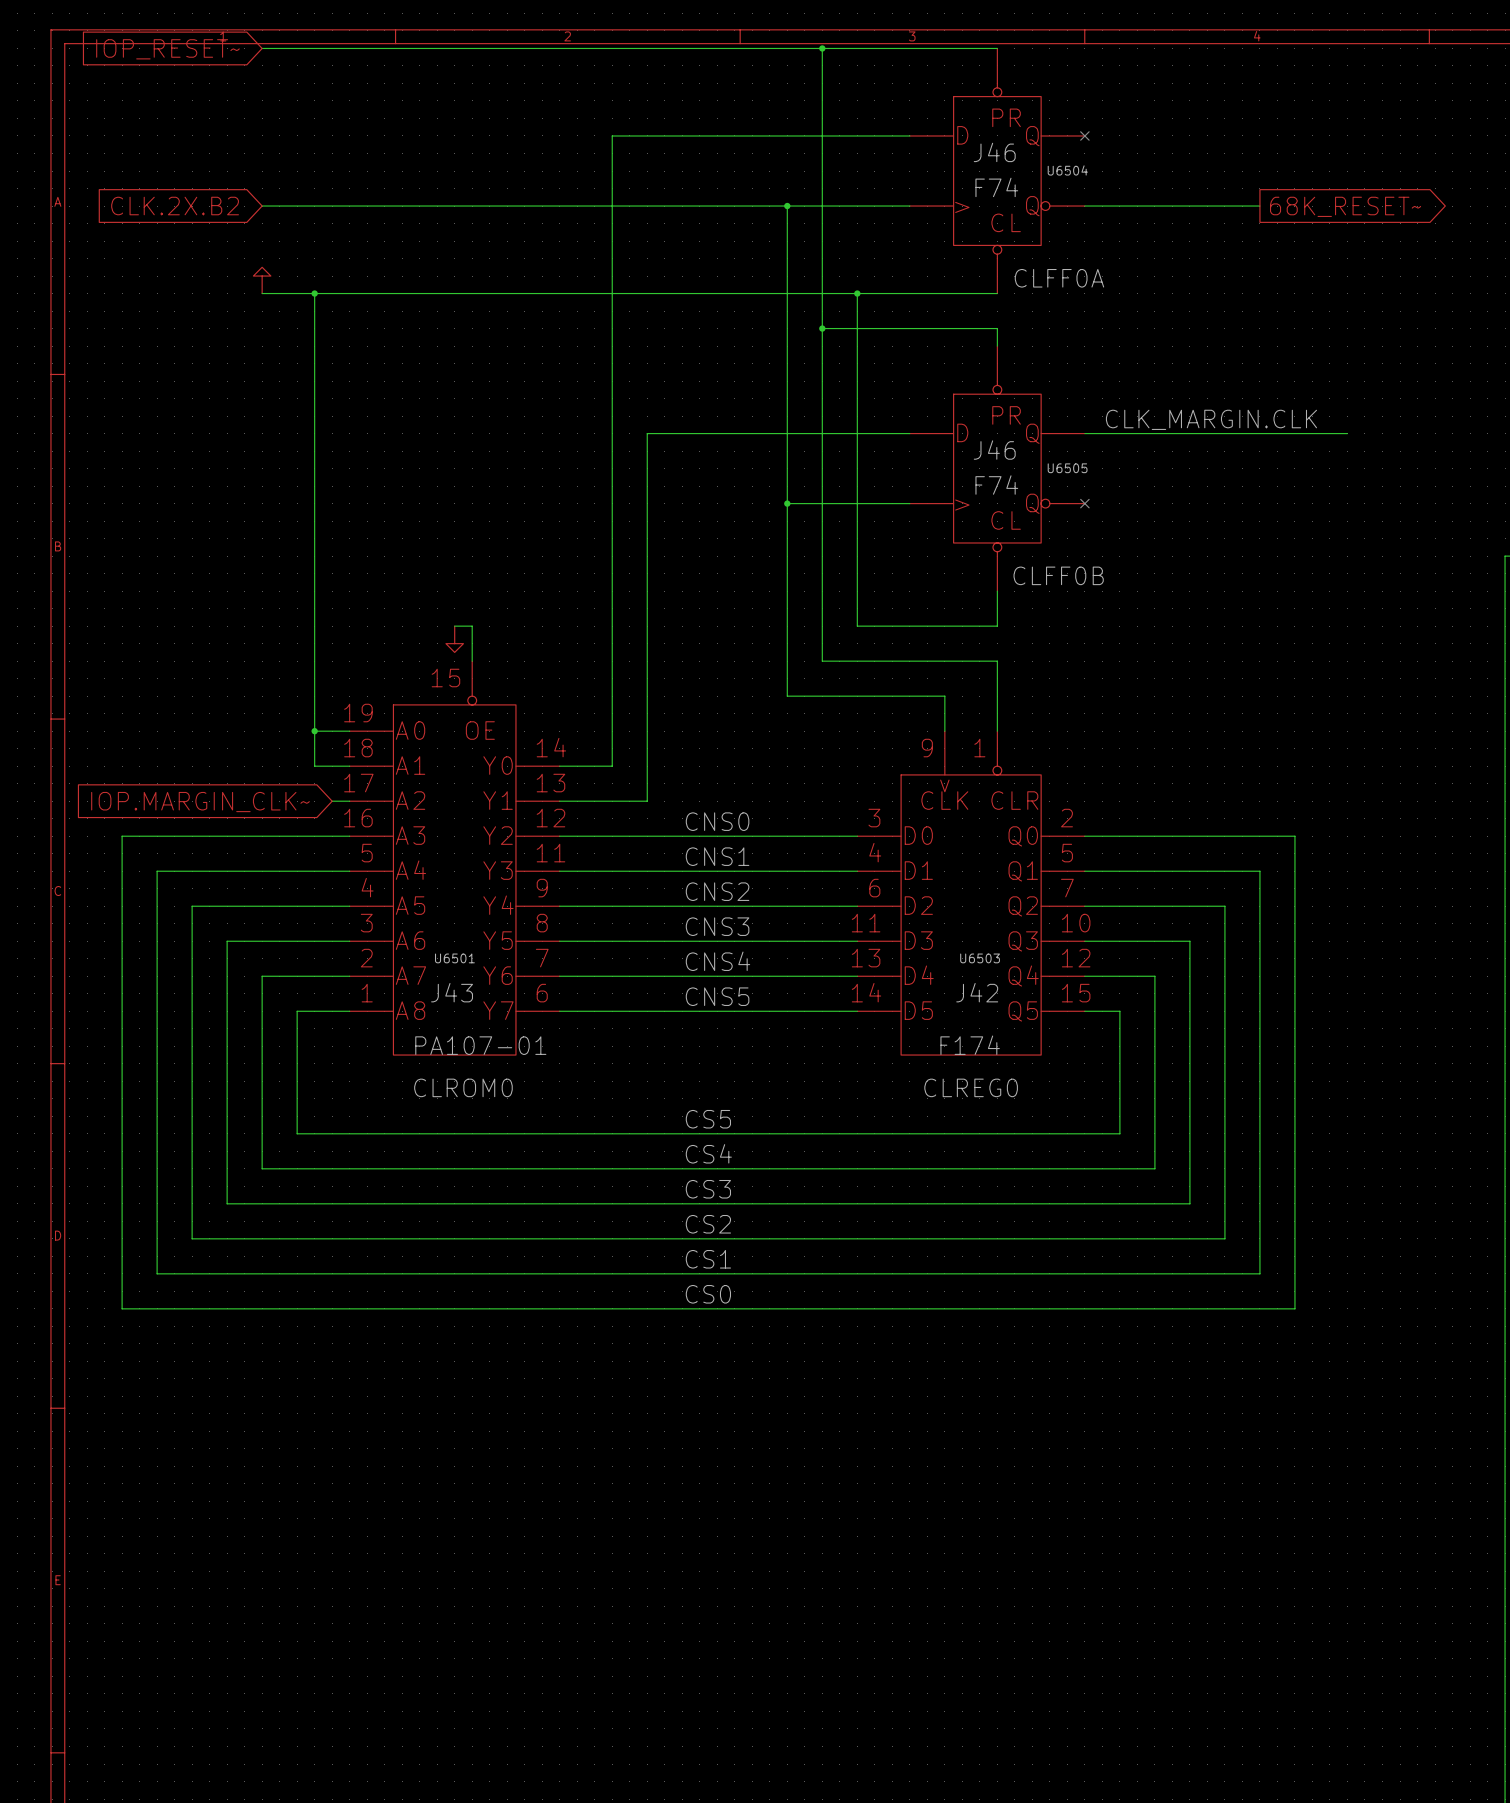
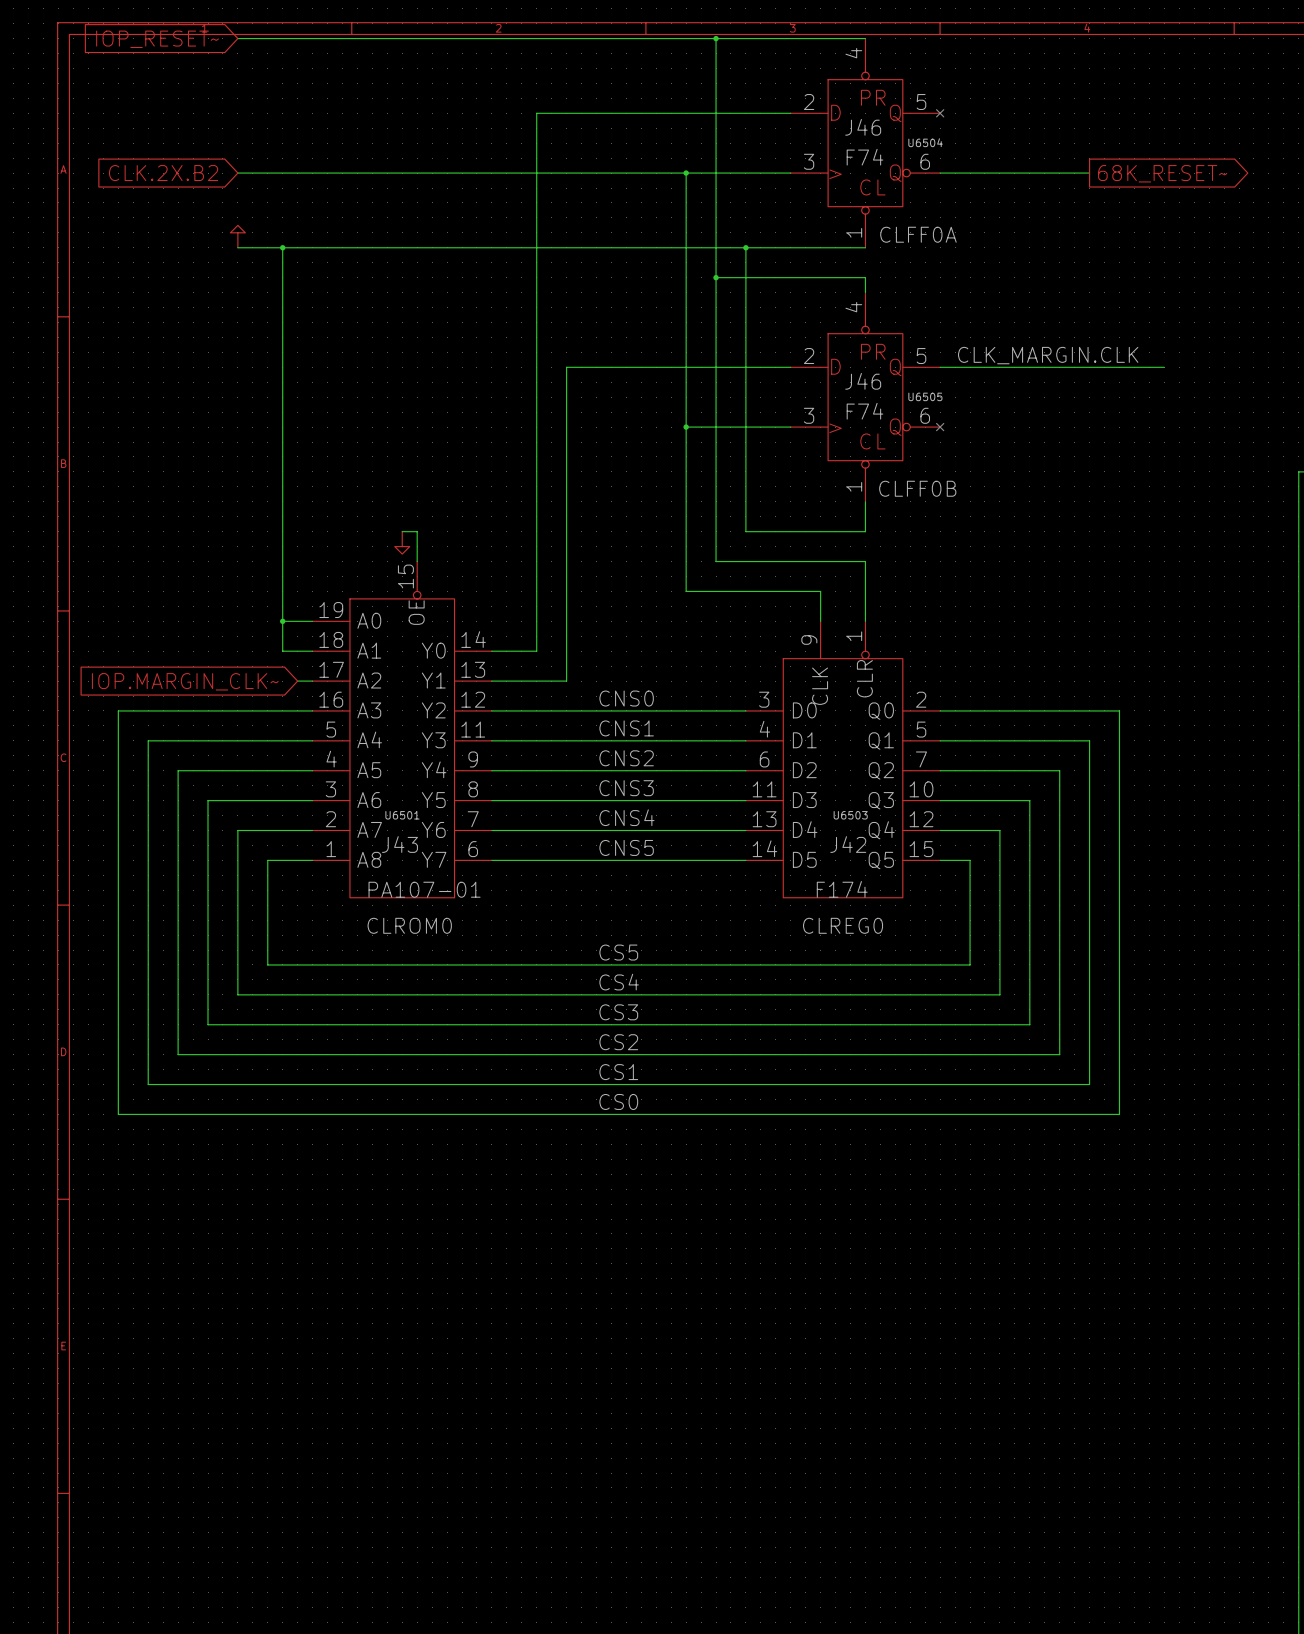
U6504 pin number: none -> 4 (853, 53)
U6504 pin number: none -> 2 (809, 102)
U6504 pin number: none -> 5 (921, 102)
U6504 pin number: none -> 3 (809, 161)
U6504 pin number: none -> 6 (925, 161)
U6504 pin number: none -> 1 (854, 232)
U6505 pin number: none -> 4 (853, 307)
U6505 pin number: none -> 2 (809, 356)
U6505 pin number: none -> 5 (921, 356)
U6505 pin number: none -> 3 (809, 415)
U6505 pin number: none -> 6 (925, 415)
U6505 pin number: none -> 1 (854, 486)
U6501 symbol: [349, 661, 560, 1056] -> [312, 561, 492, 898]
U6503 symbol: [857, 731, 1085, 1056] -> [745, 621, 941, 898]

